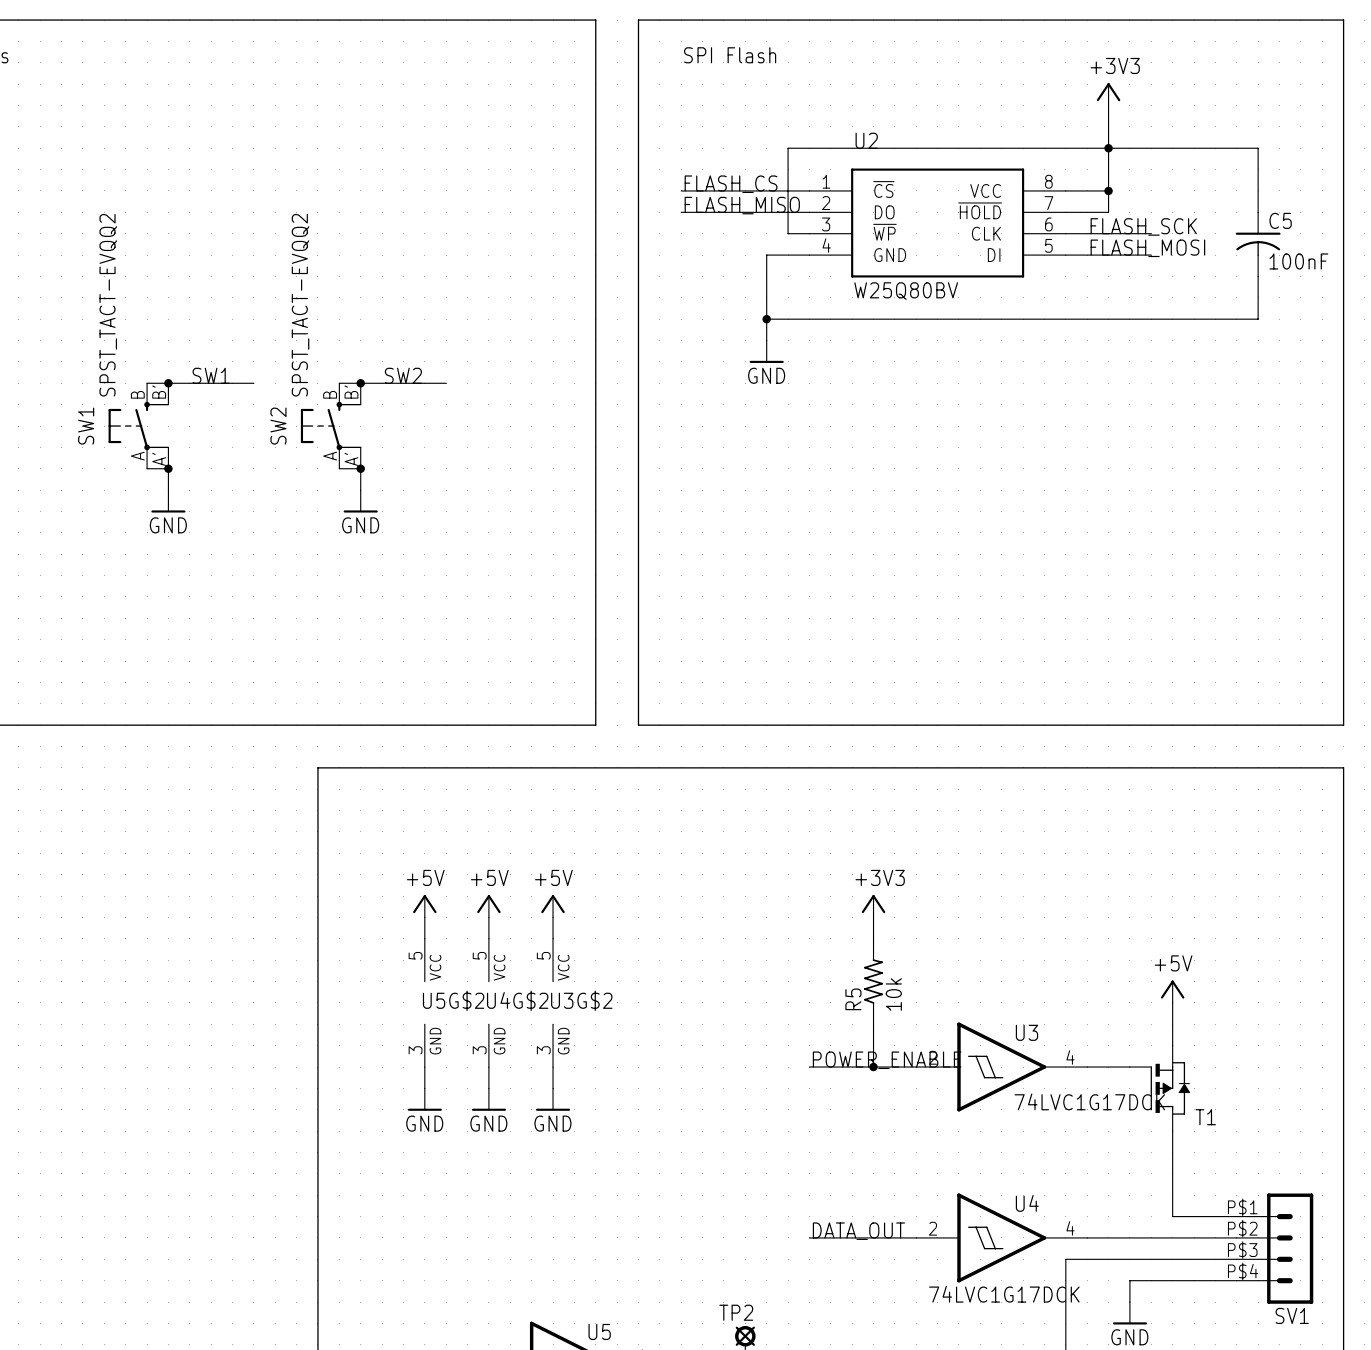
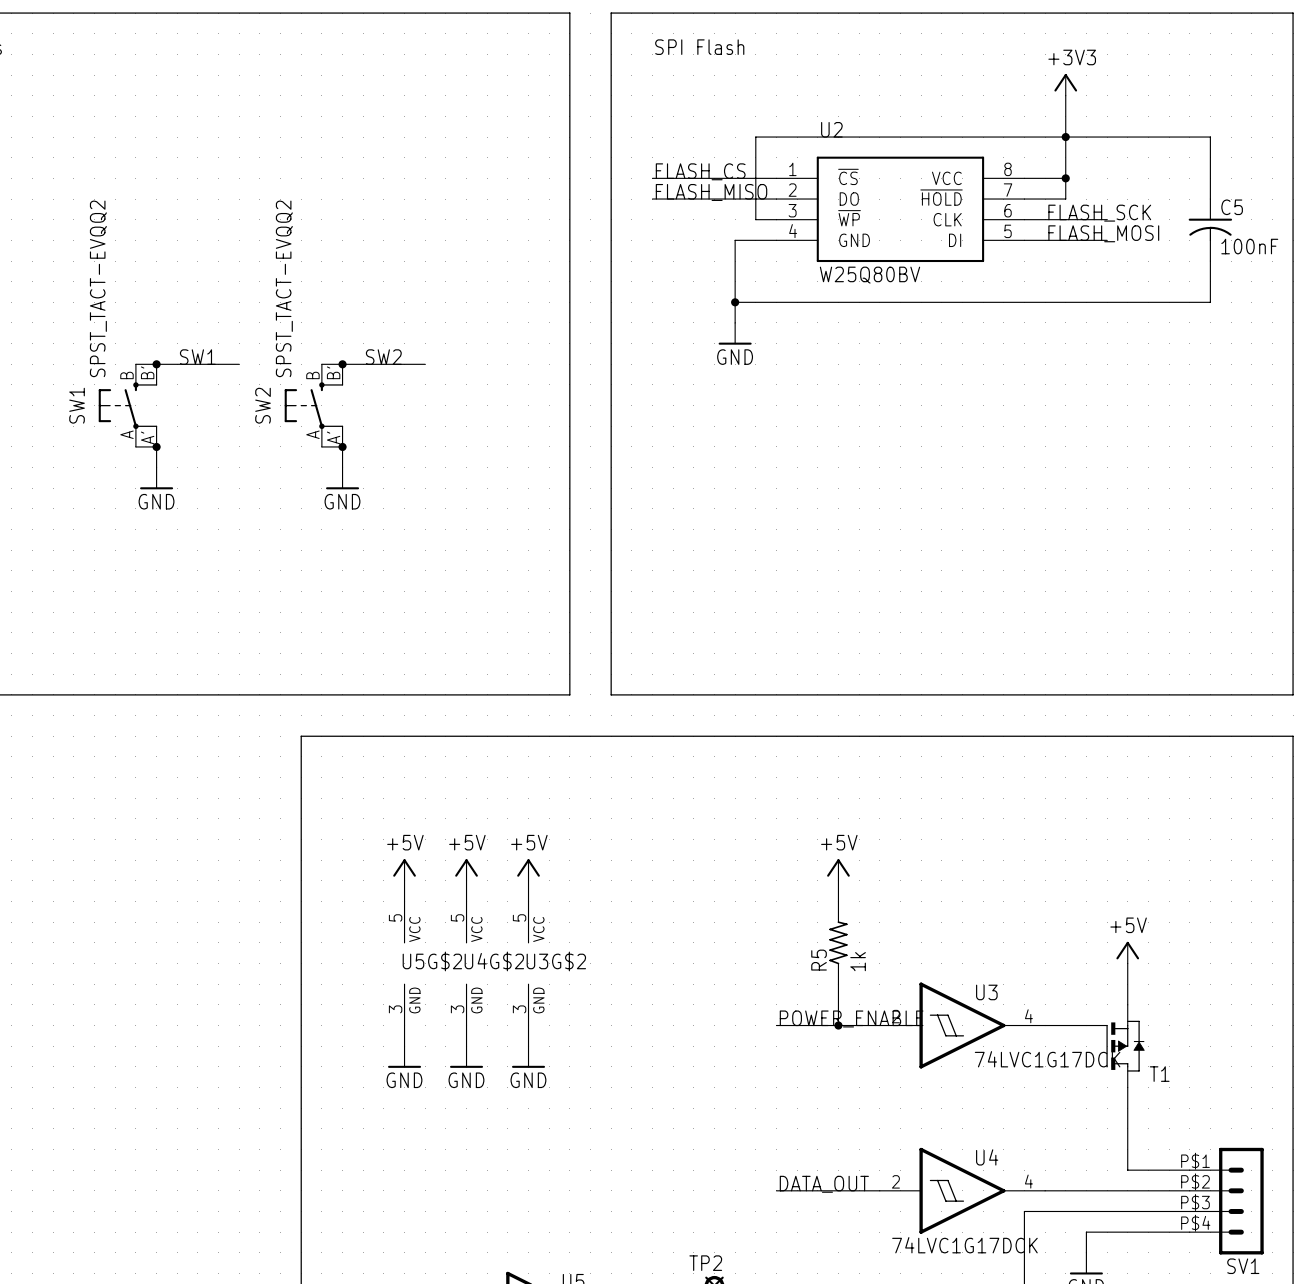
power symbol: +3V3 (873, 906) -> +5V (838, 870)
R5 value: 10k (893, 994) -> 1k (858, 961)

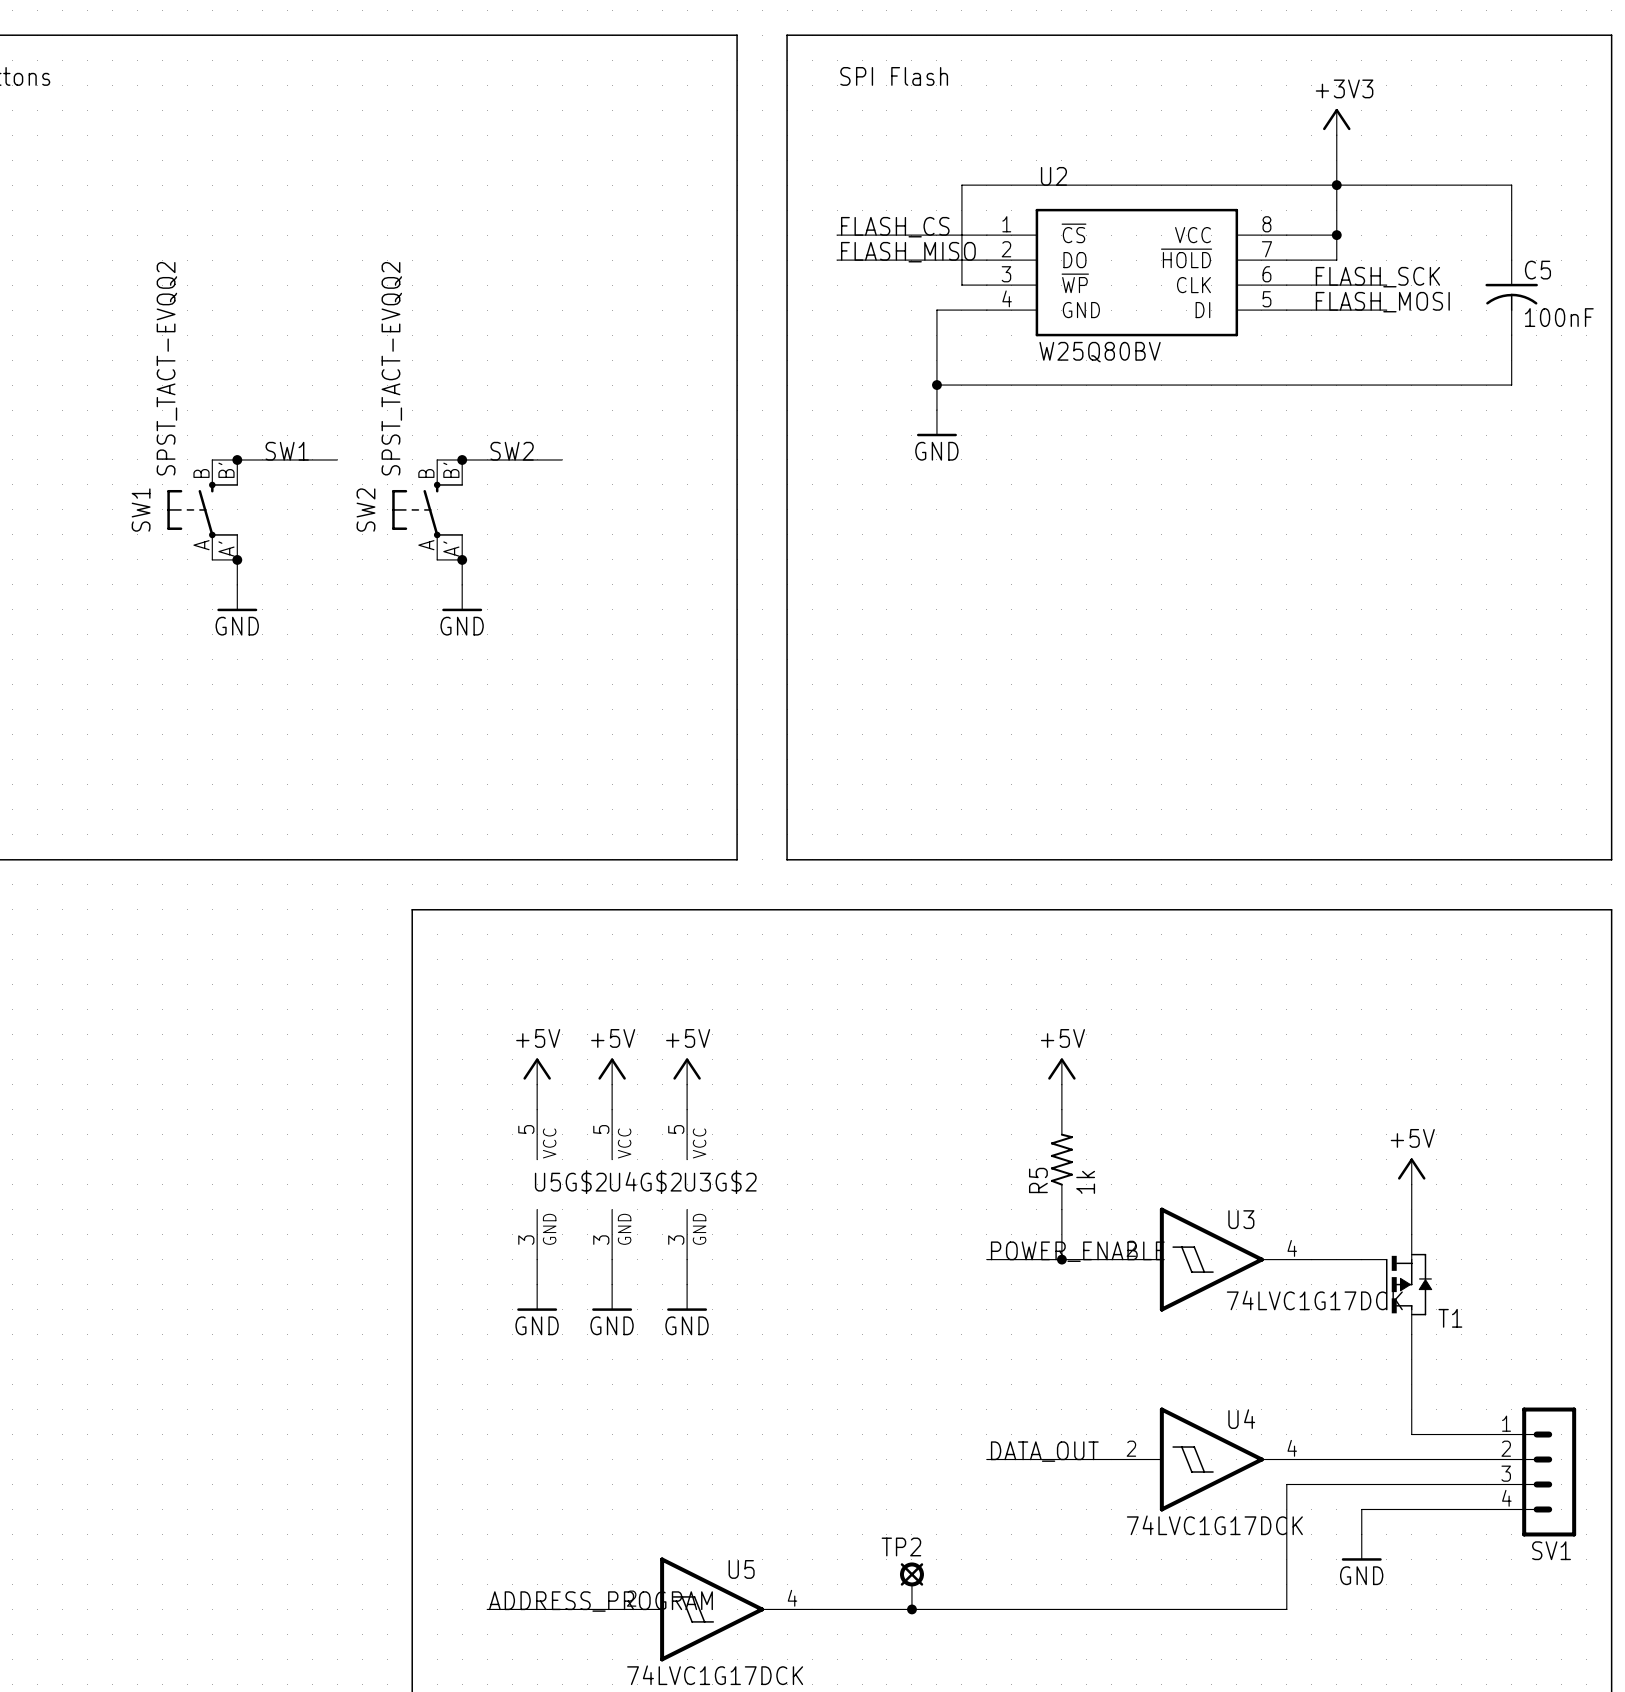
SV1 pin number: P$1 (1195, 1161) -> 1 (1506, 1423)
SV1 pin number: P$2 (1195, 1181) -> 2 (1506, 1448)
SV1 pin number: P$3 (1195, 1202) -> 3 (1506, 1473)
SV1 pin number: P$4 (1195, 1223) -> 4 (1506, 1498)

